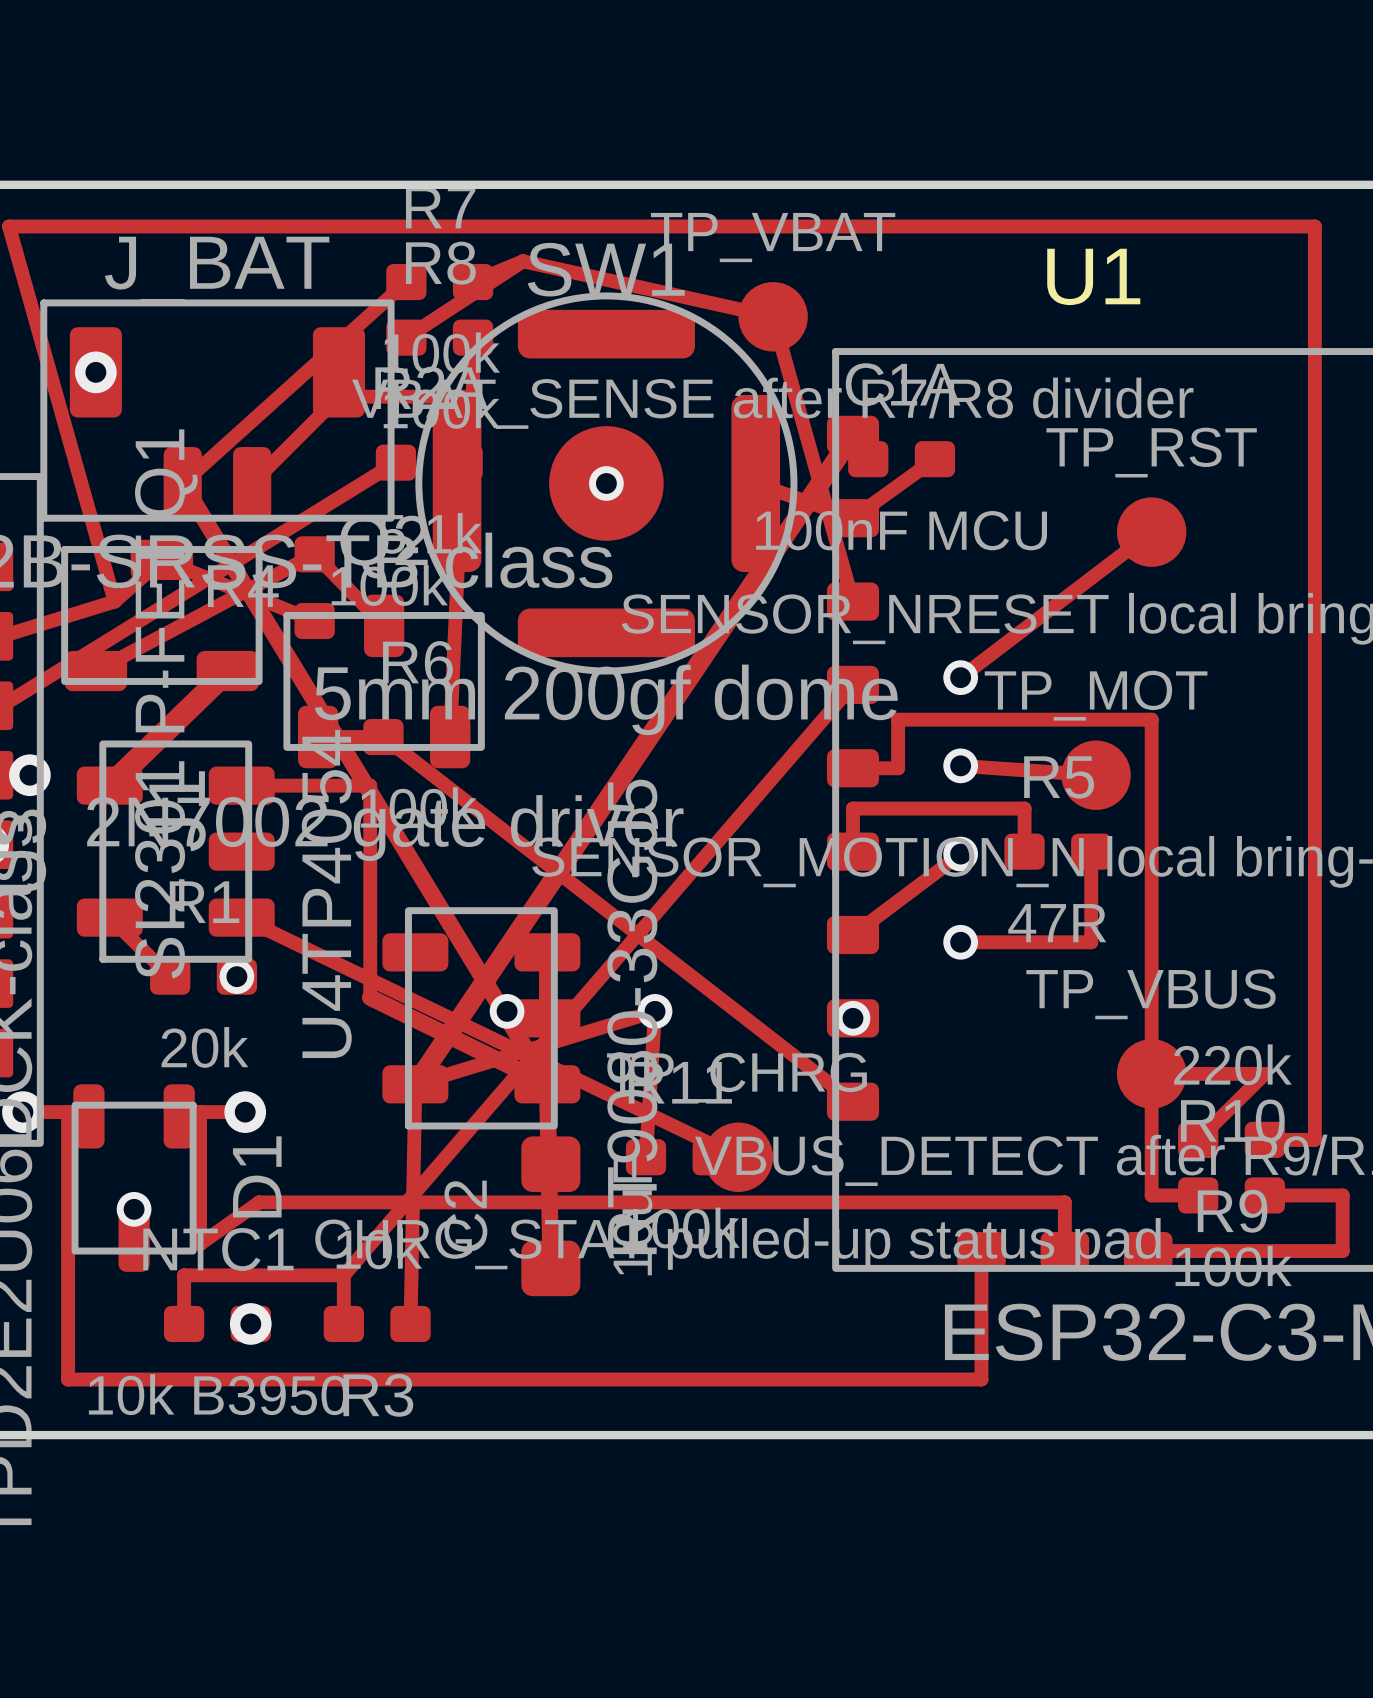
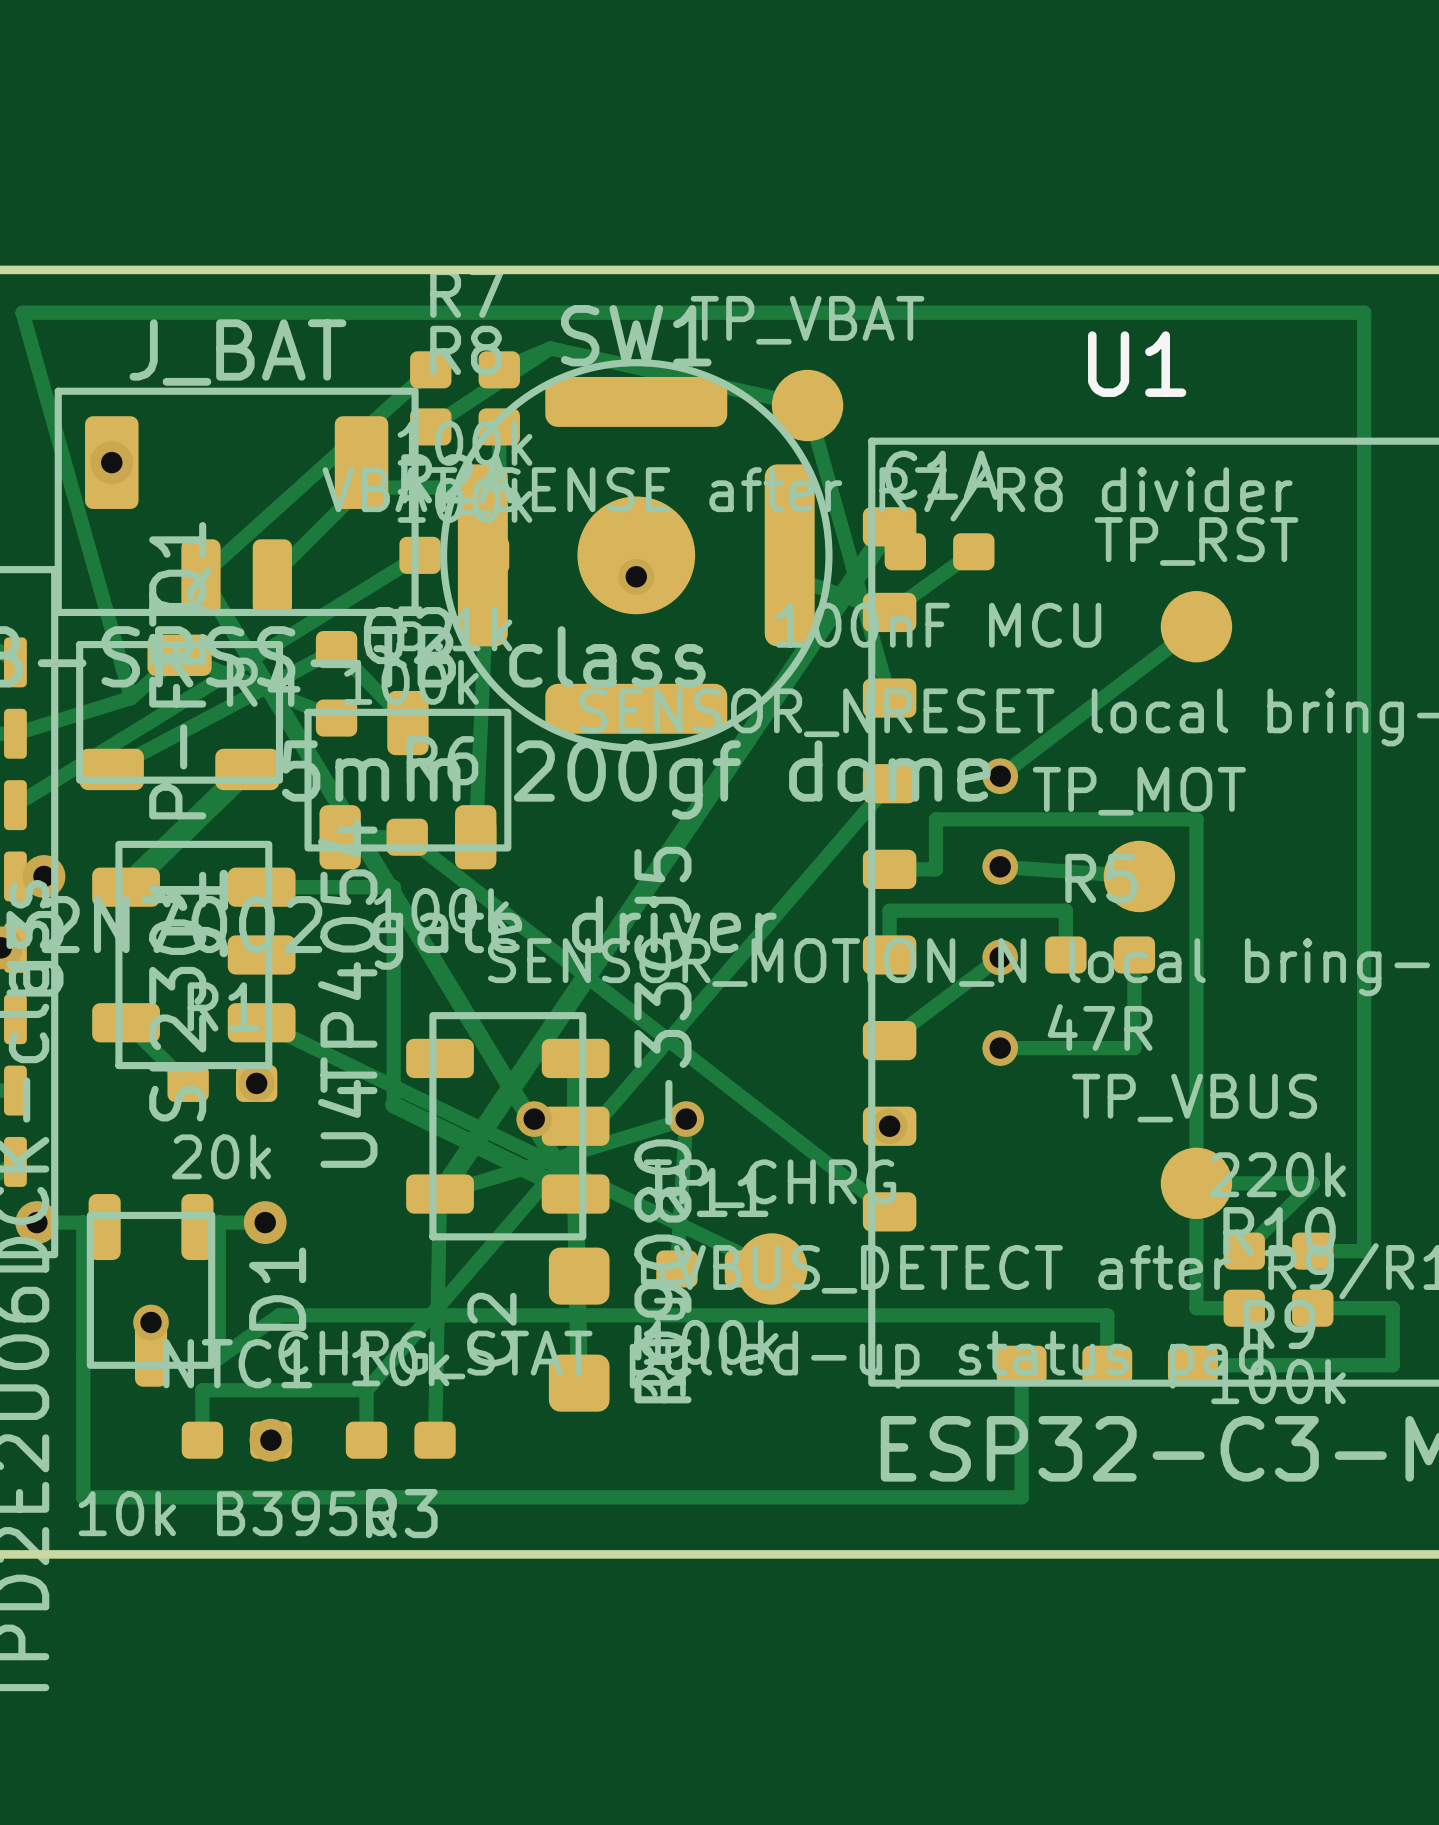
SW1 position: (606, 483) -> (636, 555)

